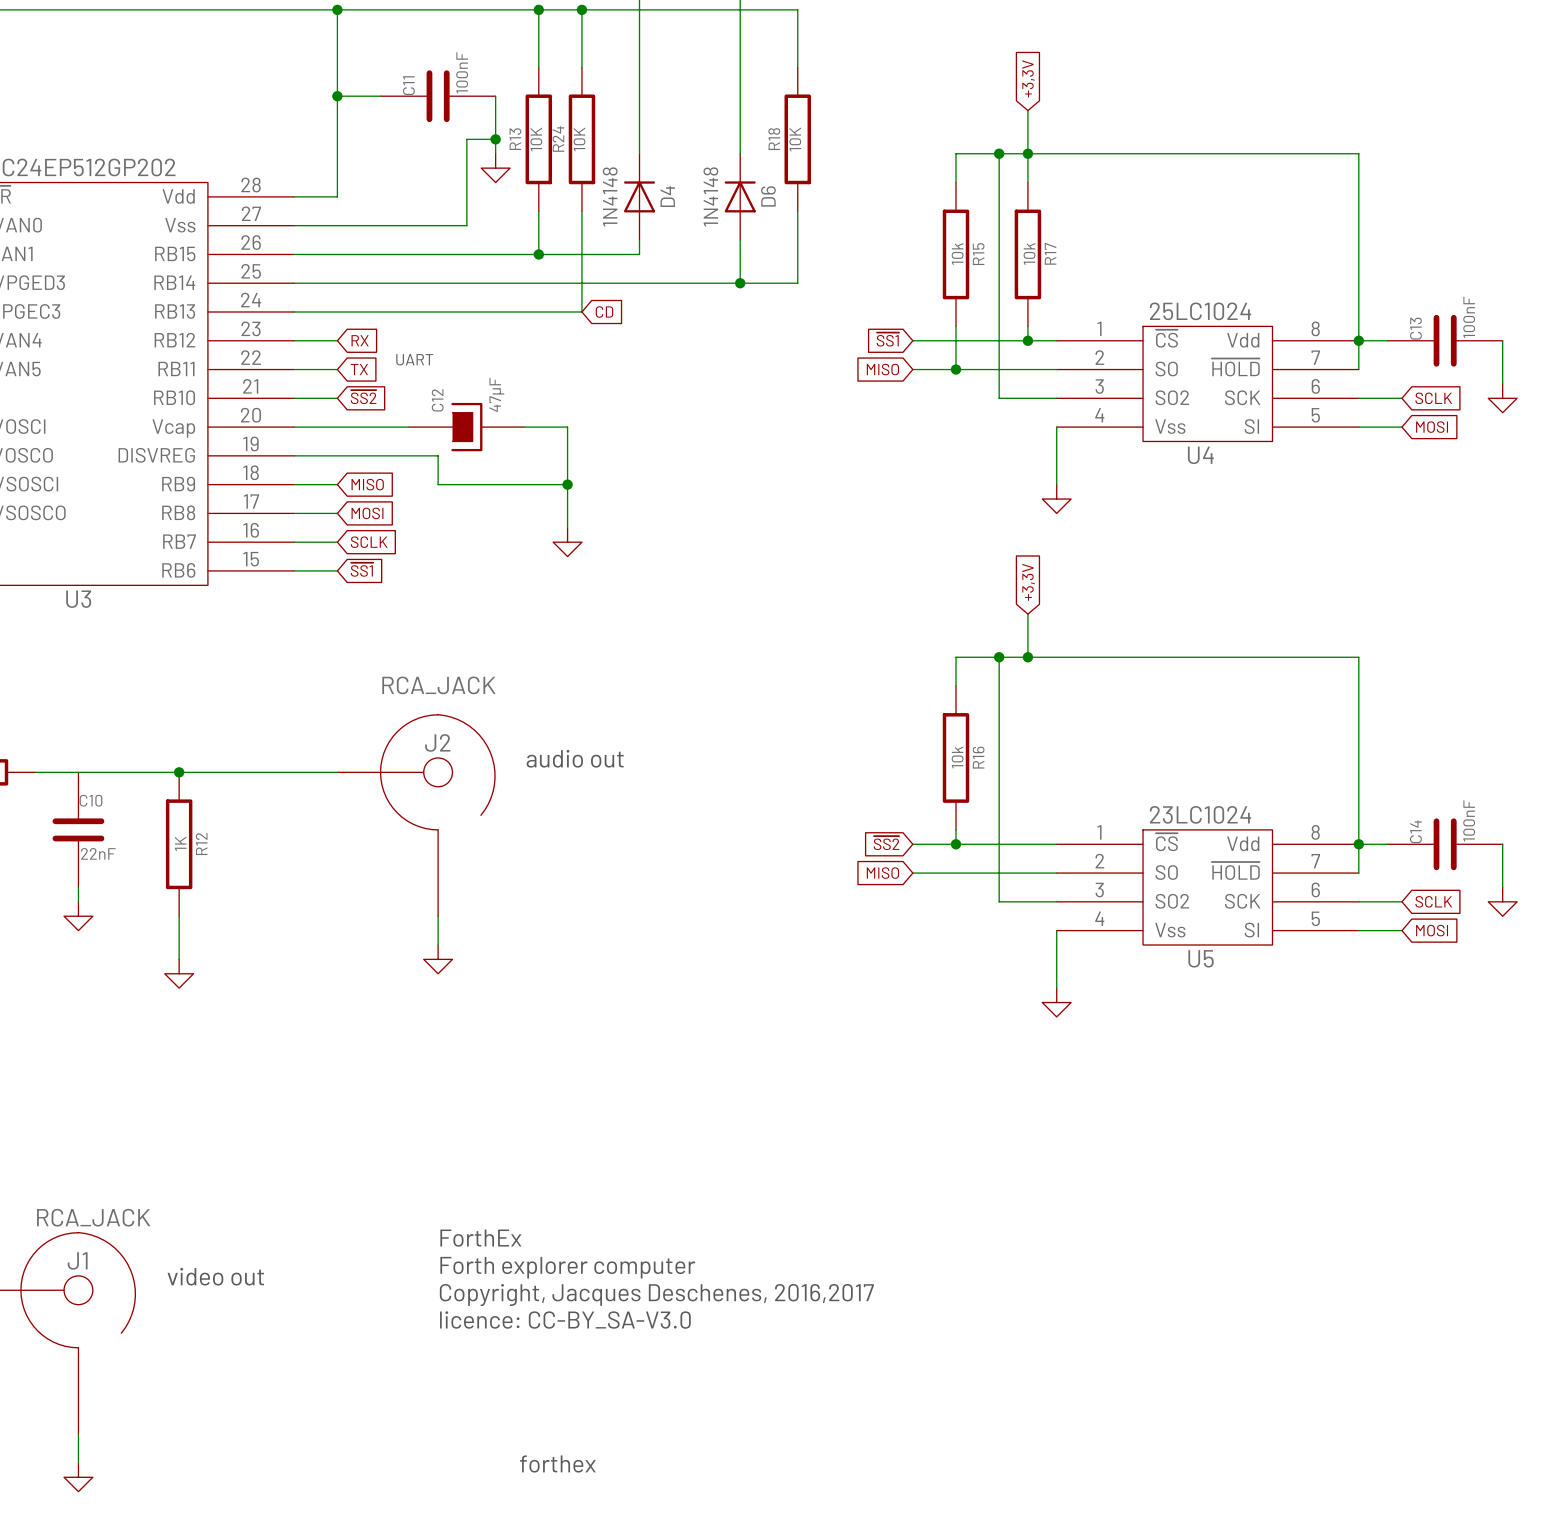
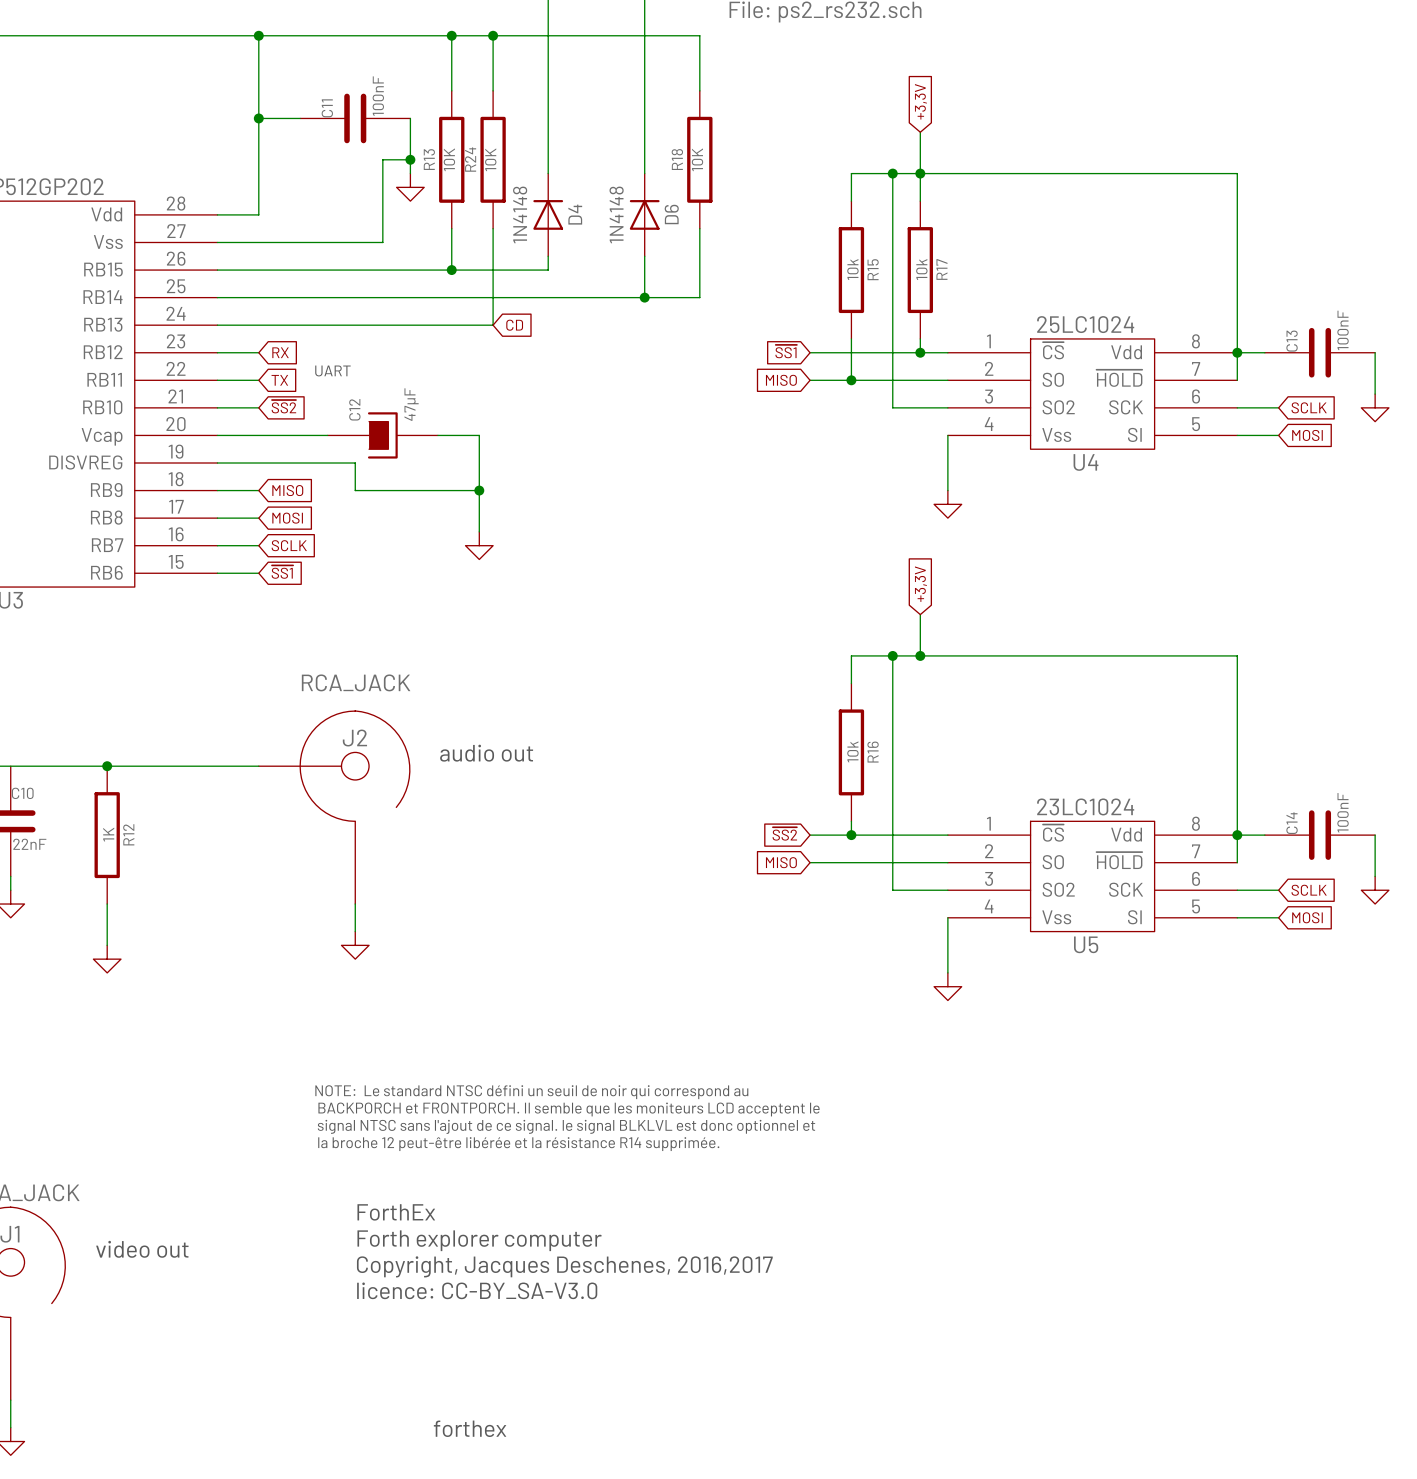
text: none -> NOTE: Le standard NTSC défini un seuil de noir qui correspond au (531, 1092)
text: none -> BACKPORCH et FRONTPORCH. Il semble que les moniteurs LCD acceptent le (569, 1109)
text: none -> signal NTSC sans l'ajout de ce signal. le signal BLKLVL est donc optionnel et (566, 1126)
text: none -> la broche 12 peut-être libérée et la résistance R14 supprimée. (518, 1144)

